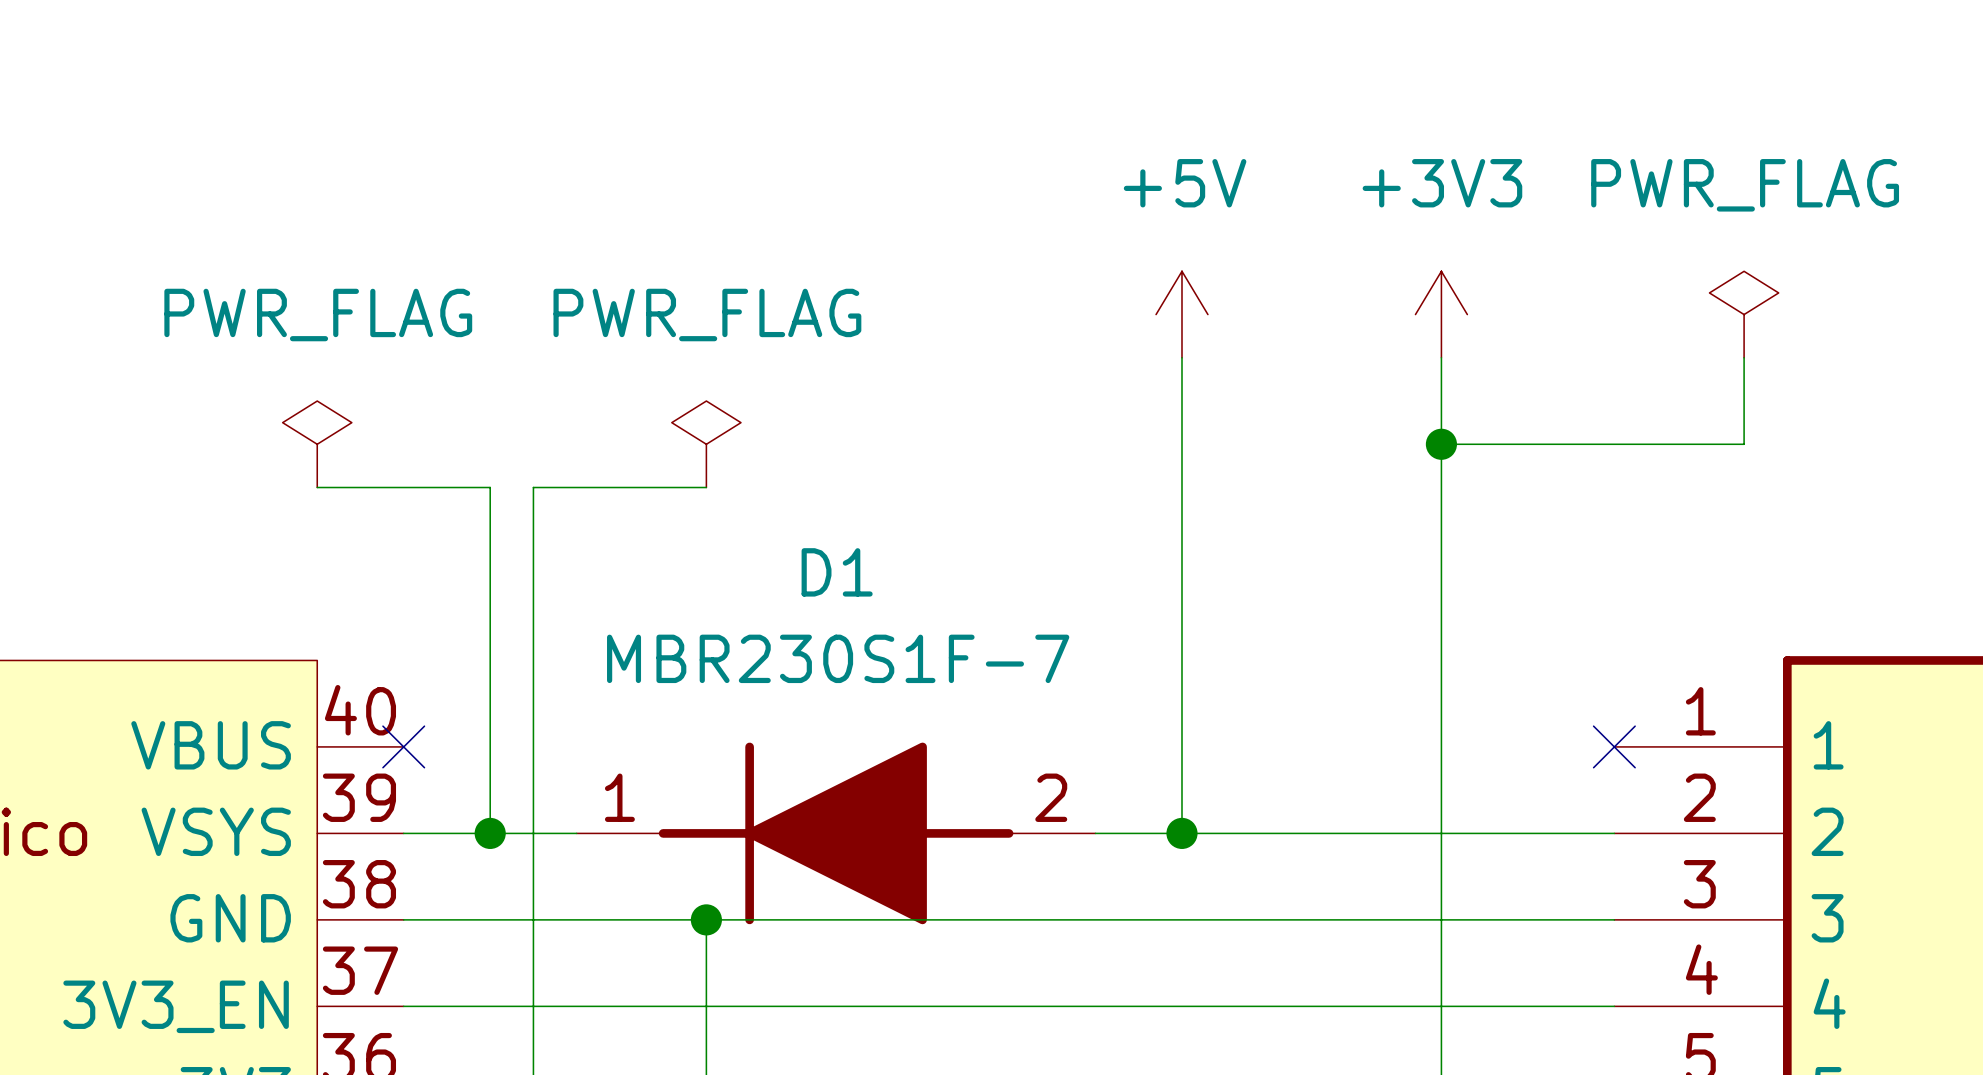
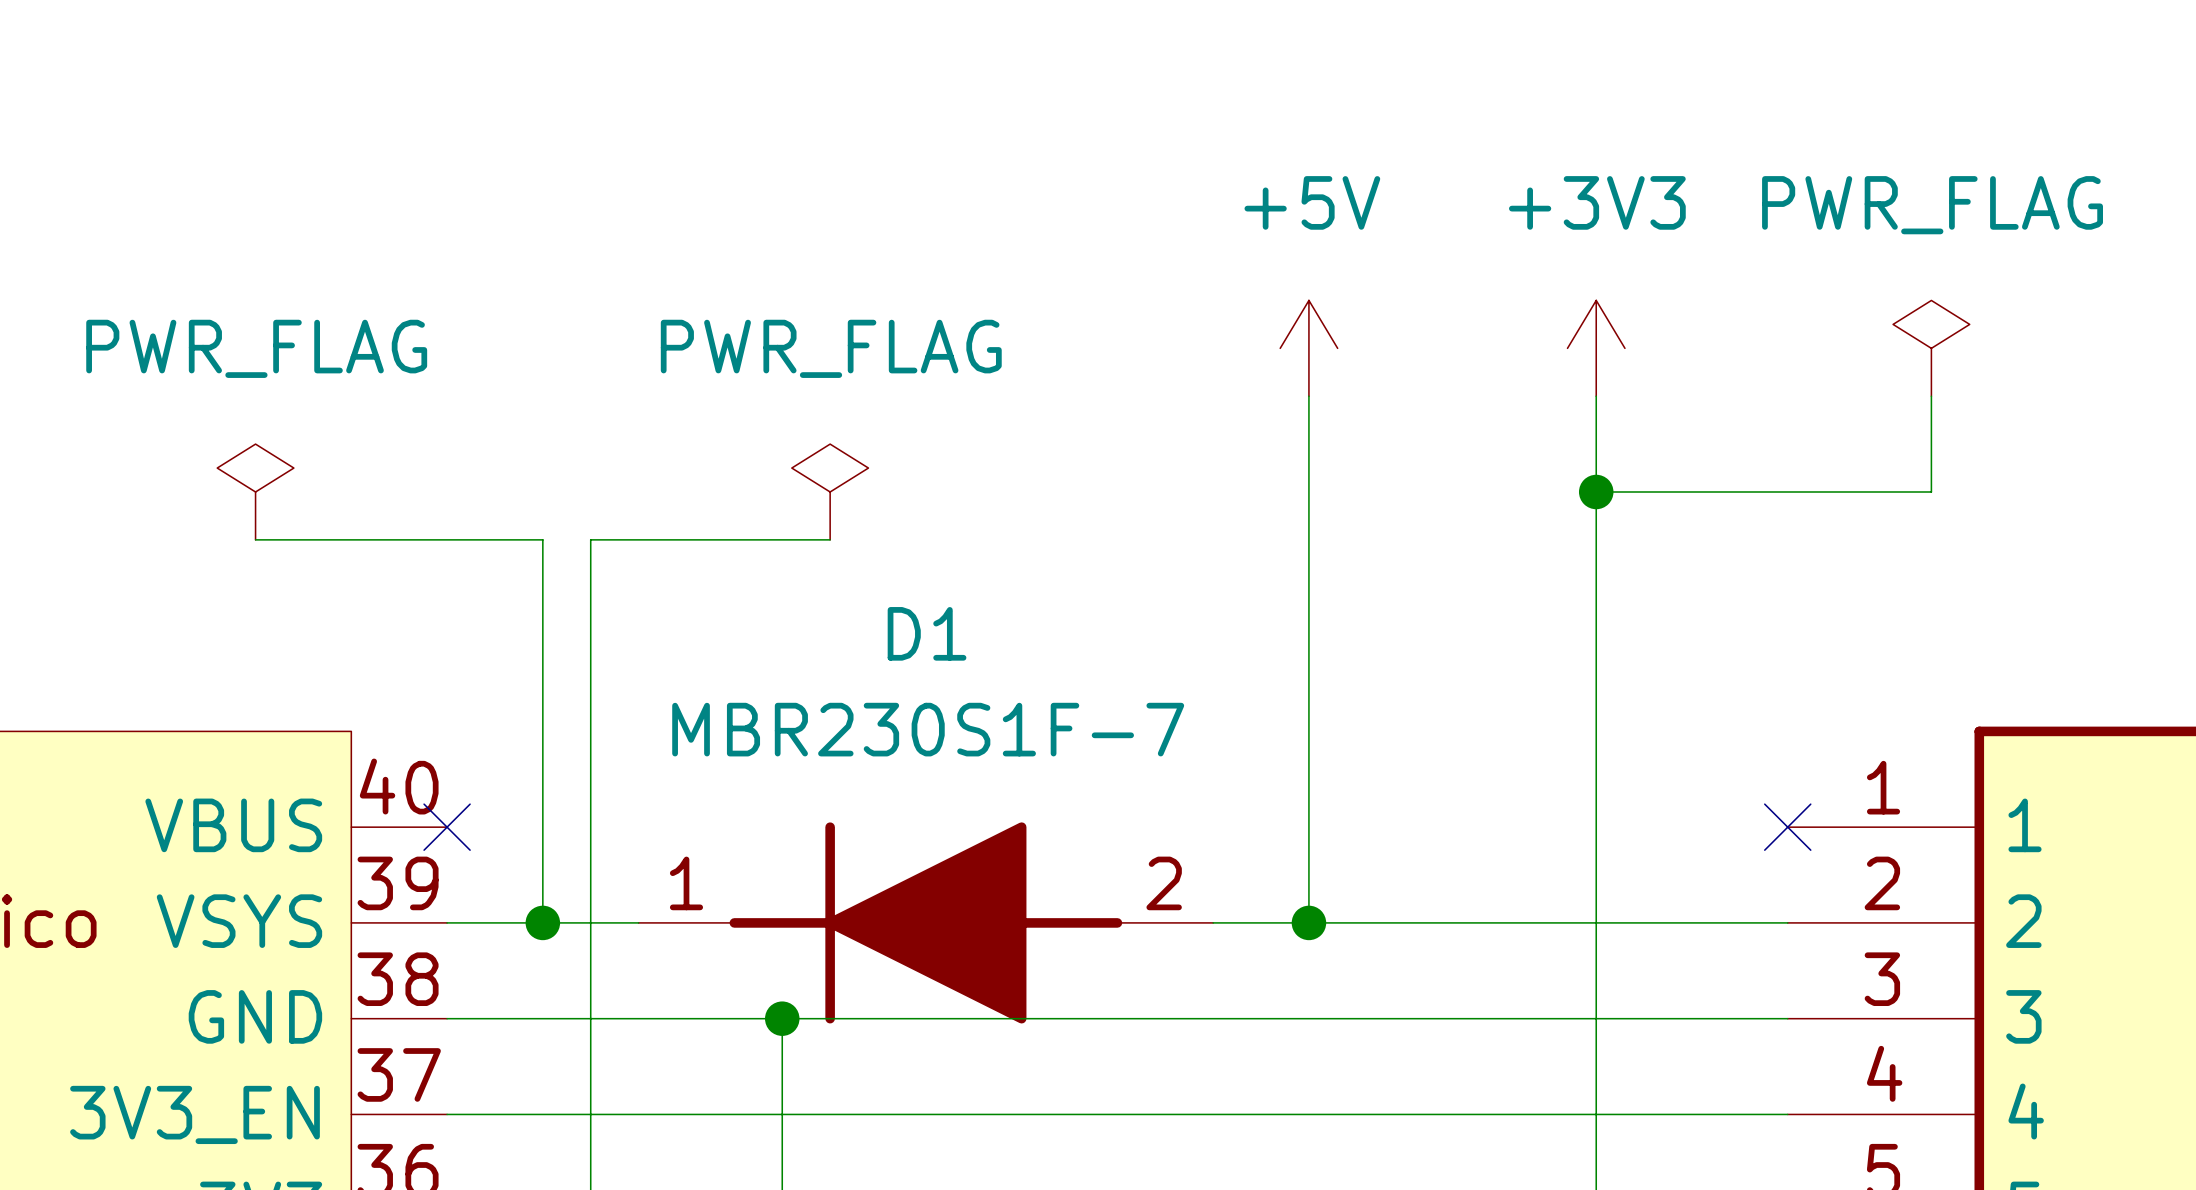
power symbol position: PWR_FLAG (317, 444) -> PWR_FLAG (255, 491)
power symbol position: PWR_FLAG (706, 444) -> PWR_FLAG (830, 491)
wire: none -> (255, 539) (351, 539)
wire: none -> (782, 539) (830, 539)

